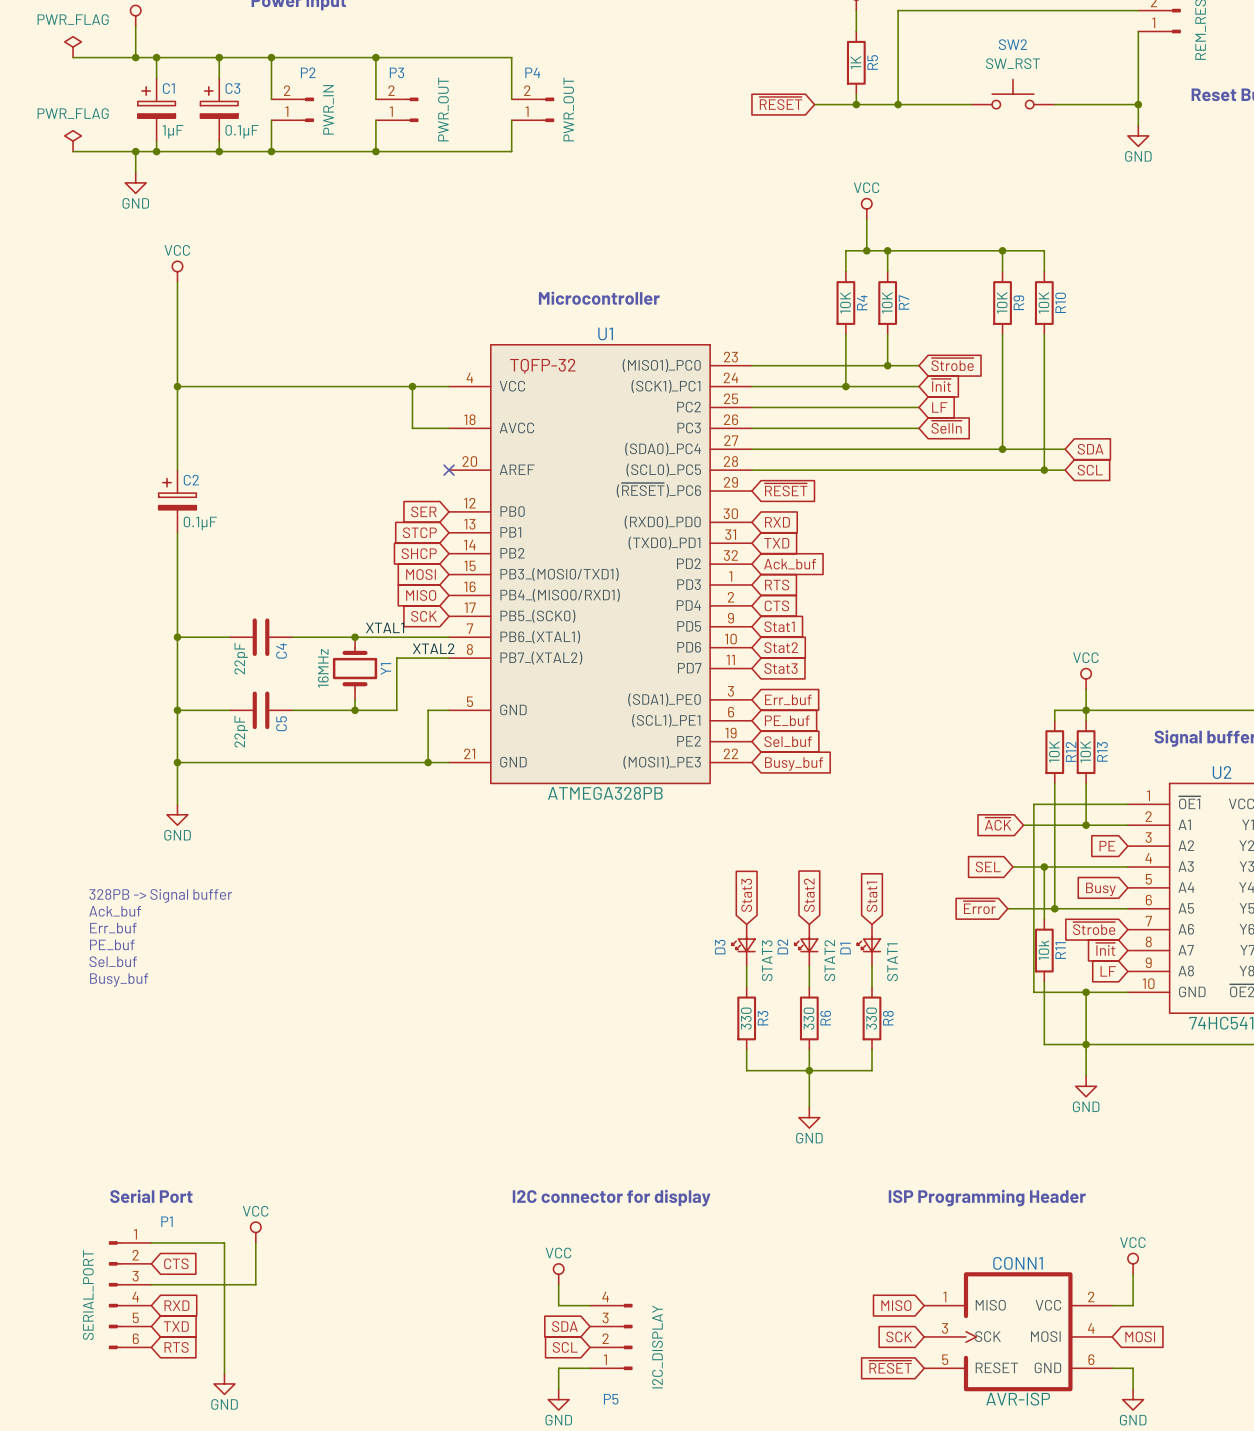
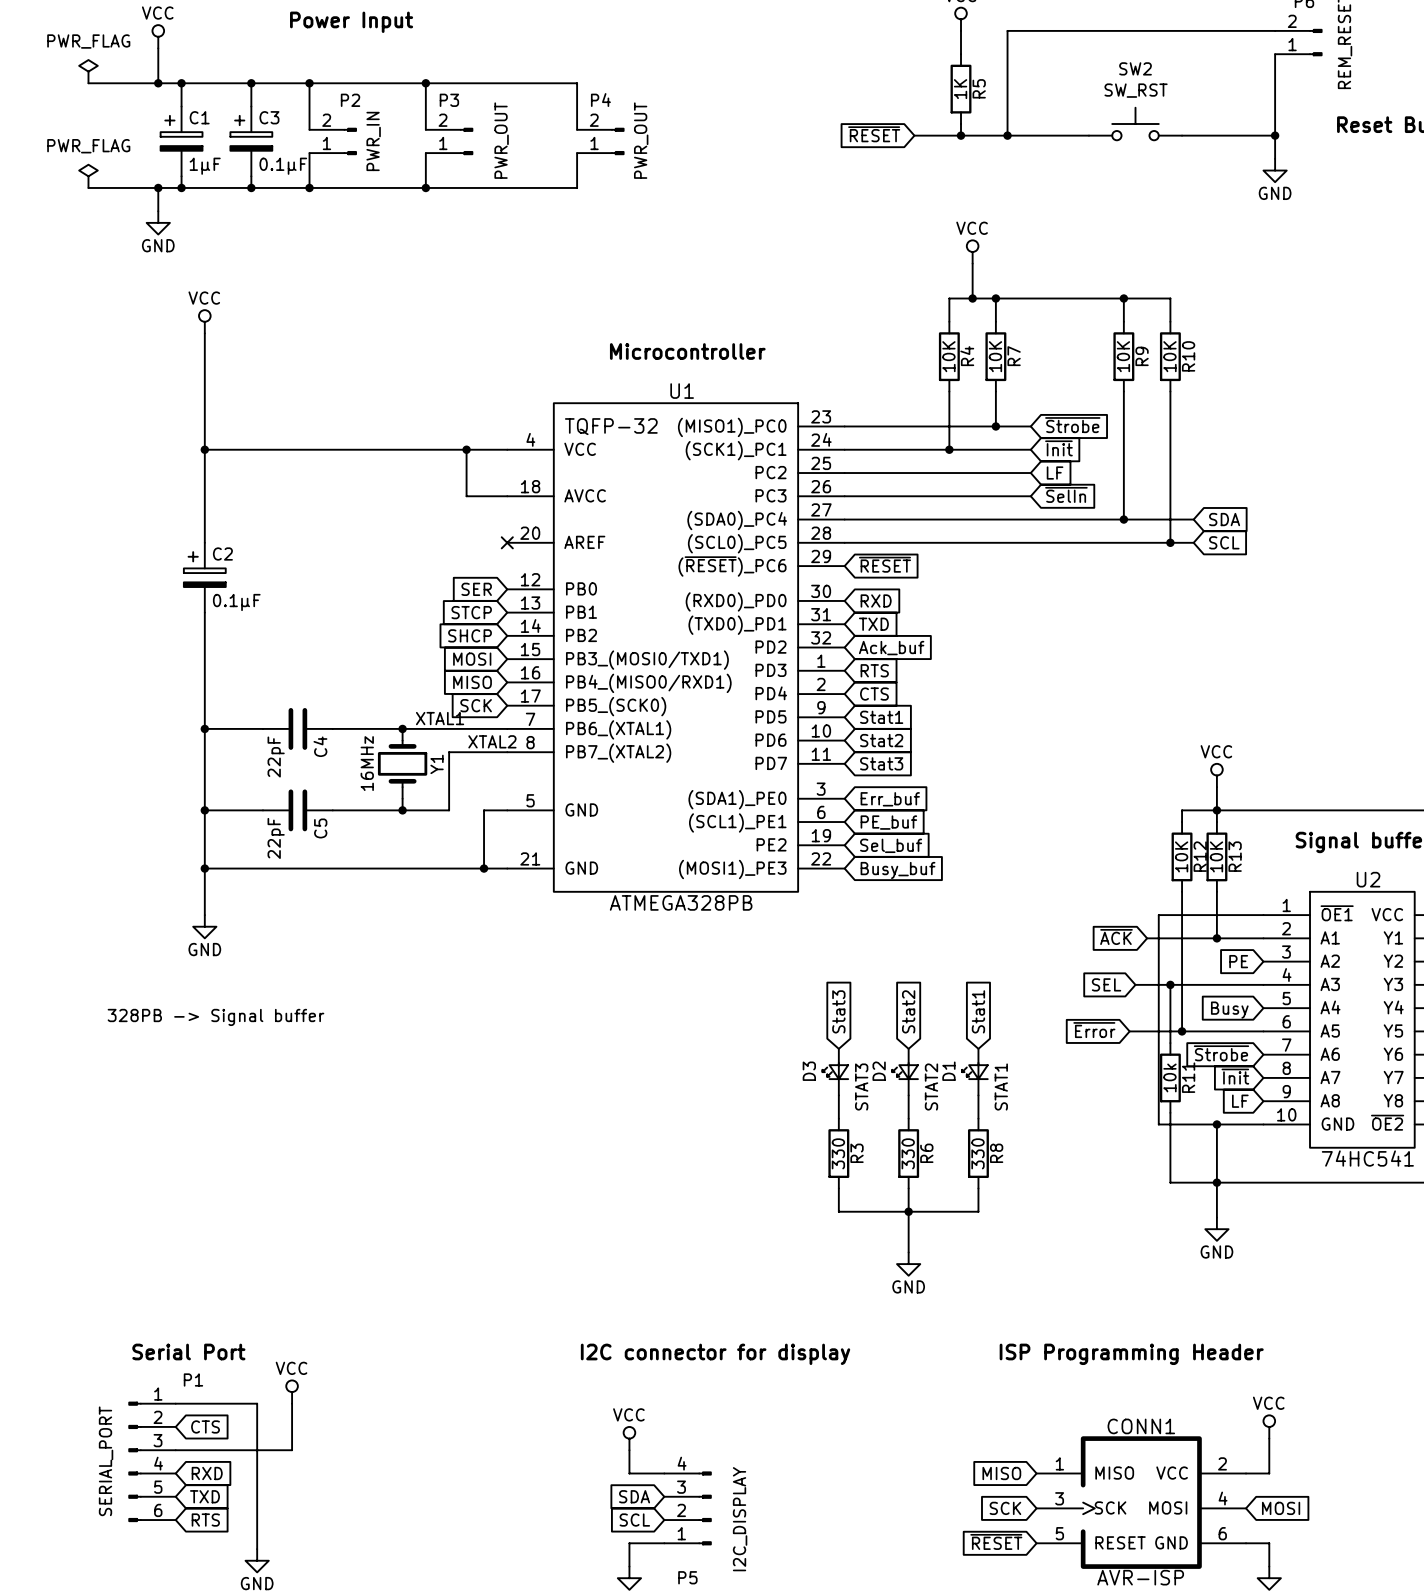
text: Ack_buf (115, 911) -> none
text: Err_buf (113, 928) -> none
text: PE_buf (112, 944) -> none
text: Sel_buf (113, 961) -> none
text: Busy_buf (119, 980) -> none

